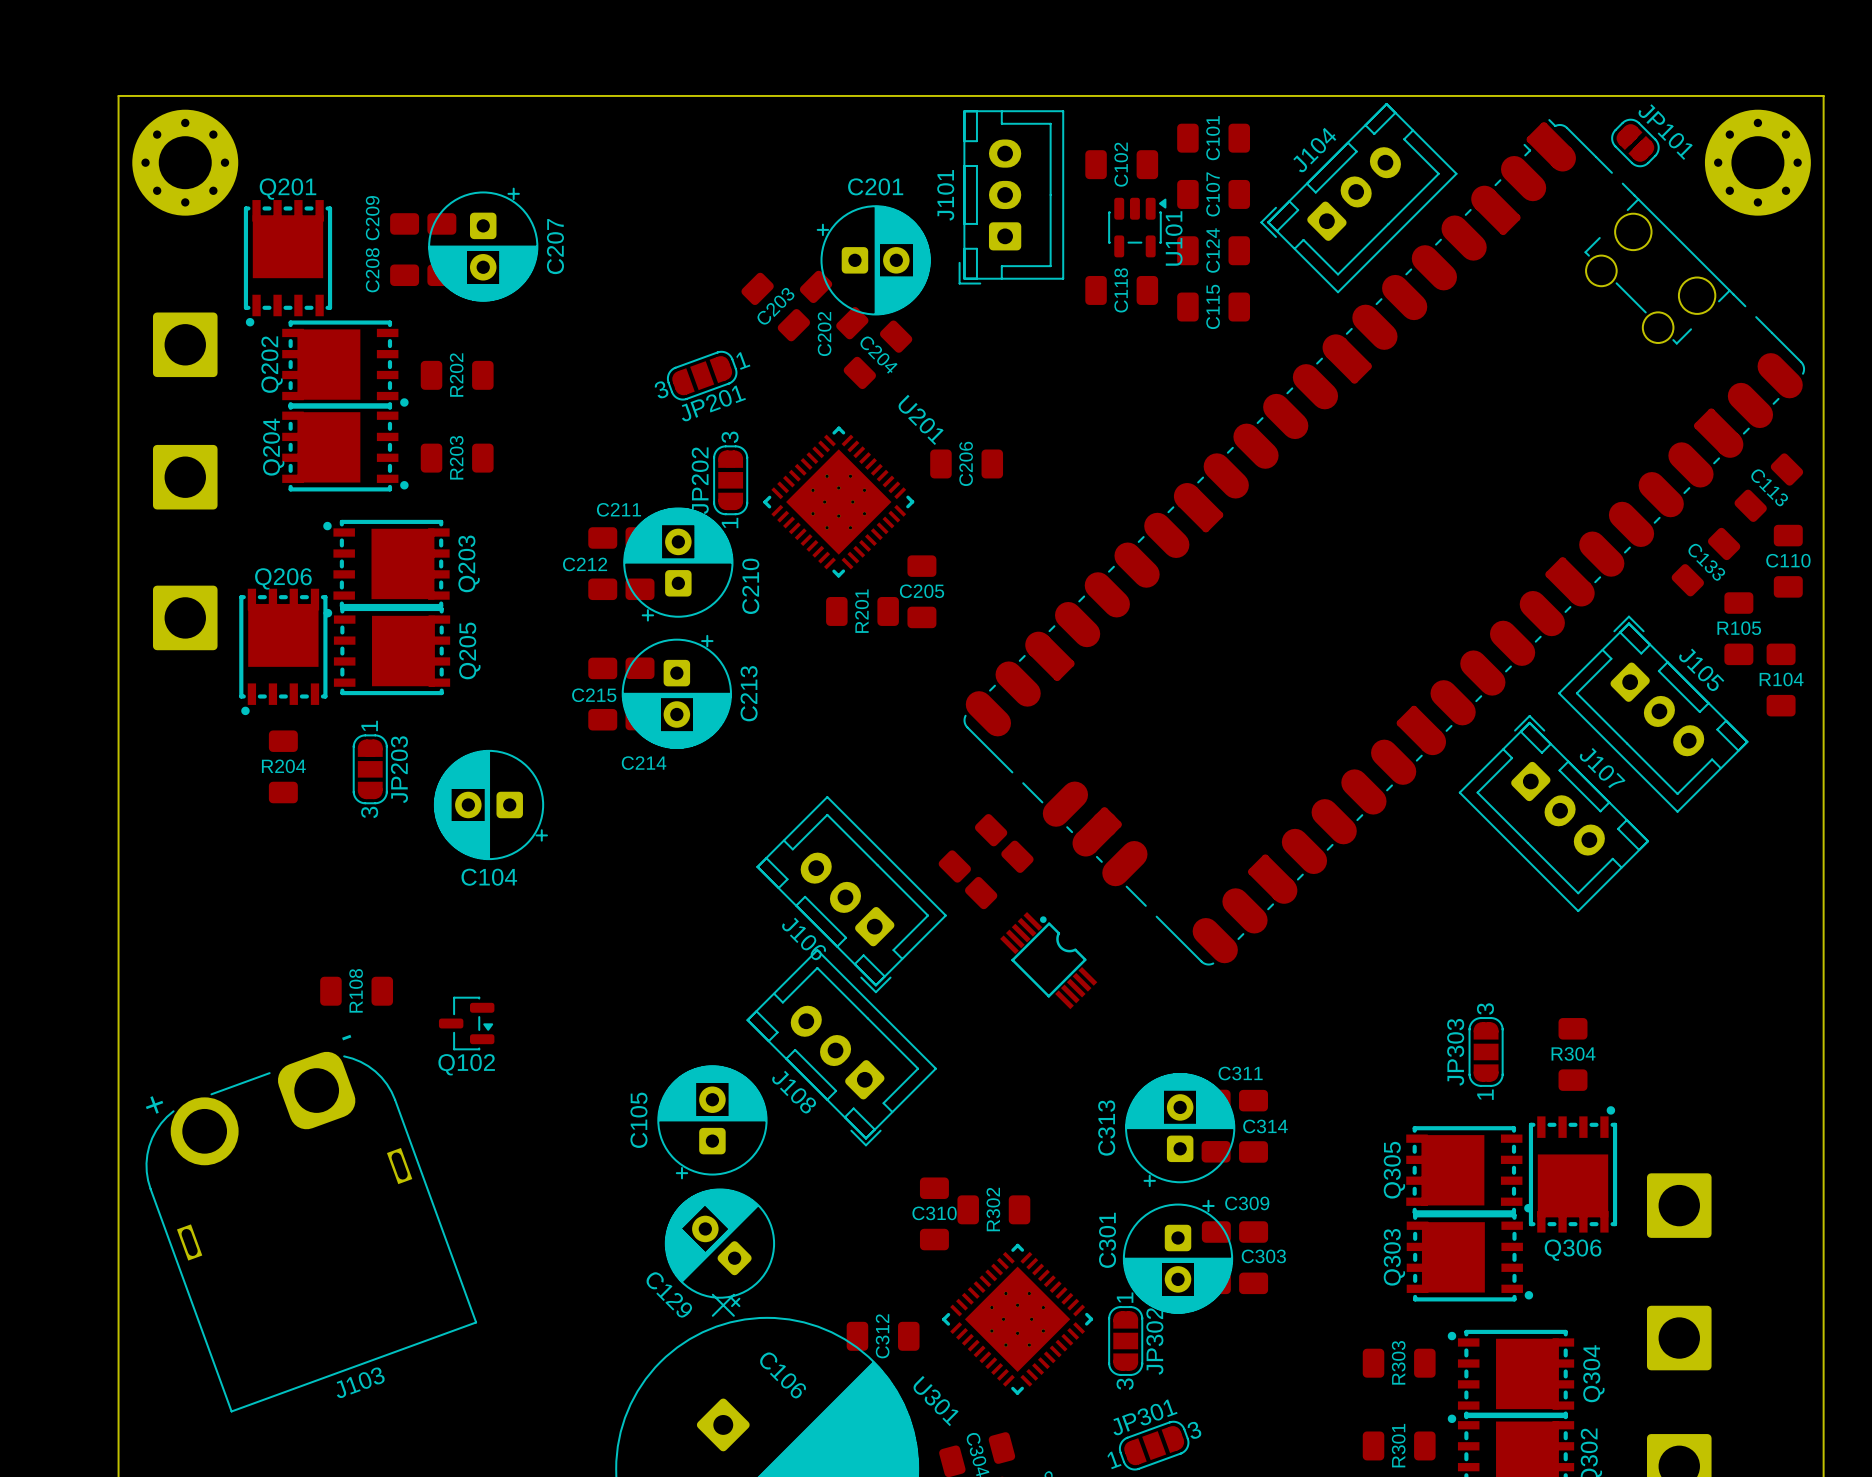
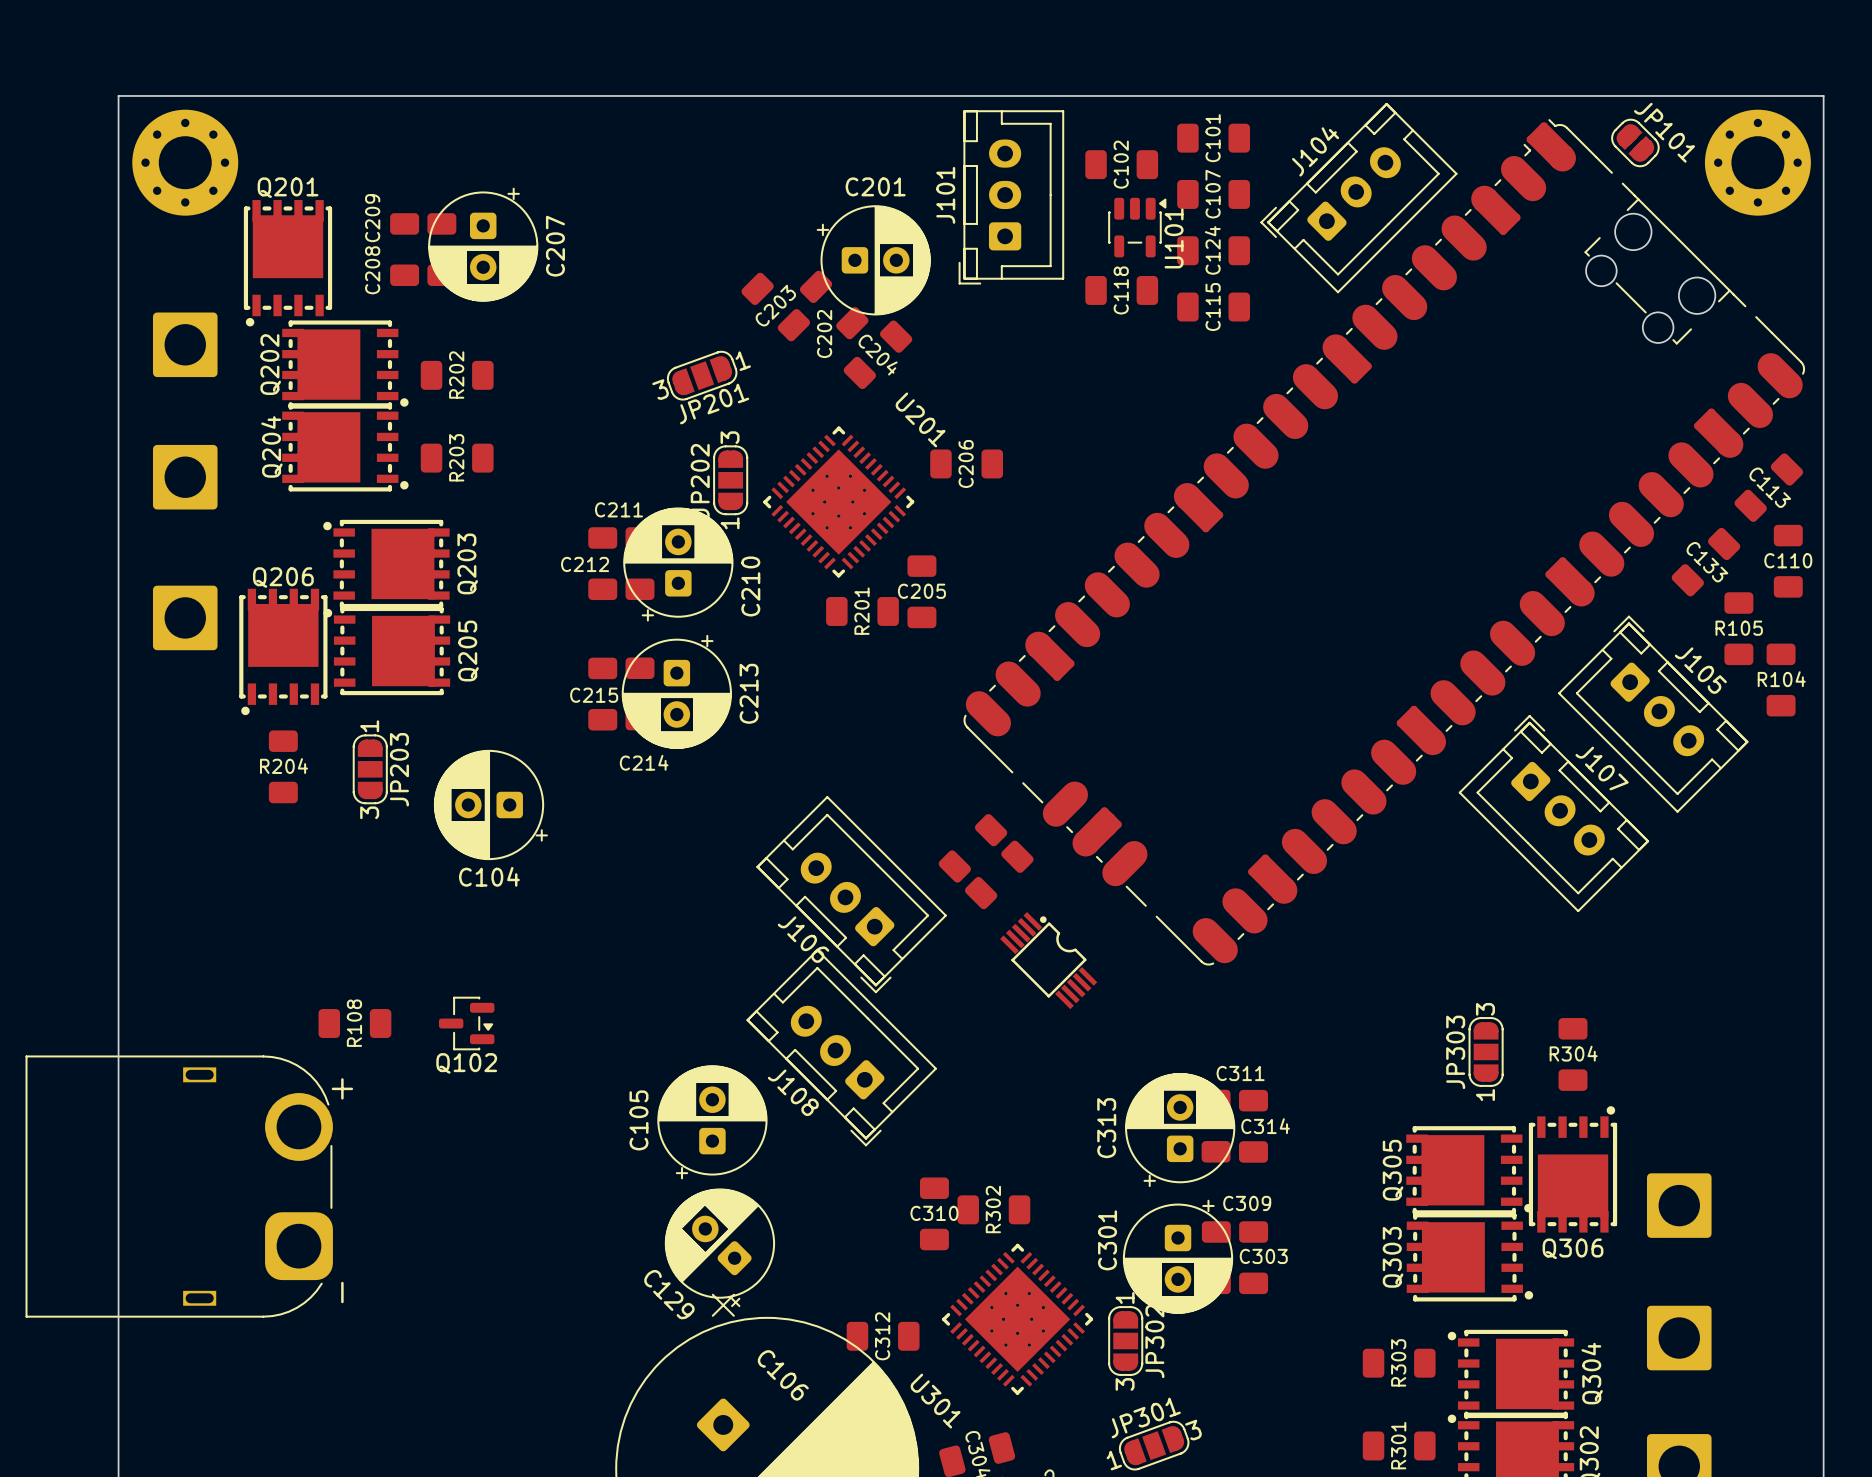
R108 position: (356, 991) -> (354, 1023)
part: none -> (179, 1186)
J103: (311, 1232) -> none

